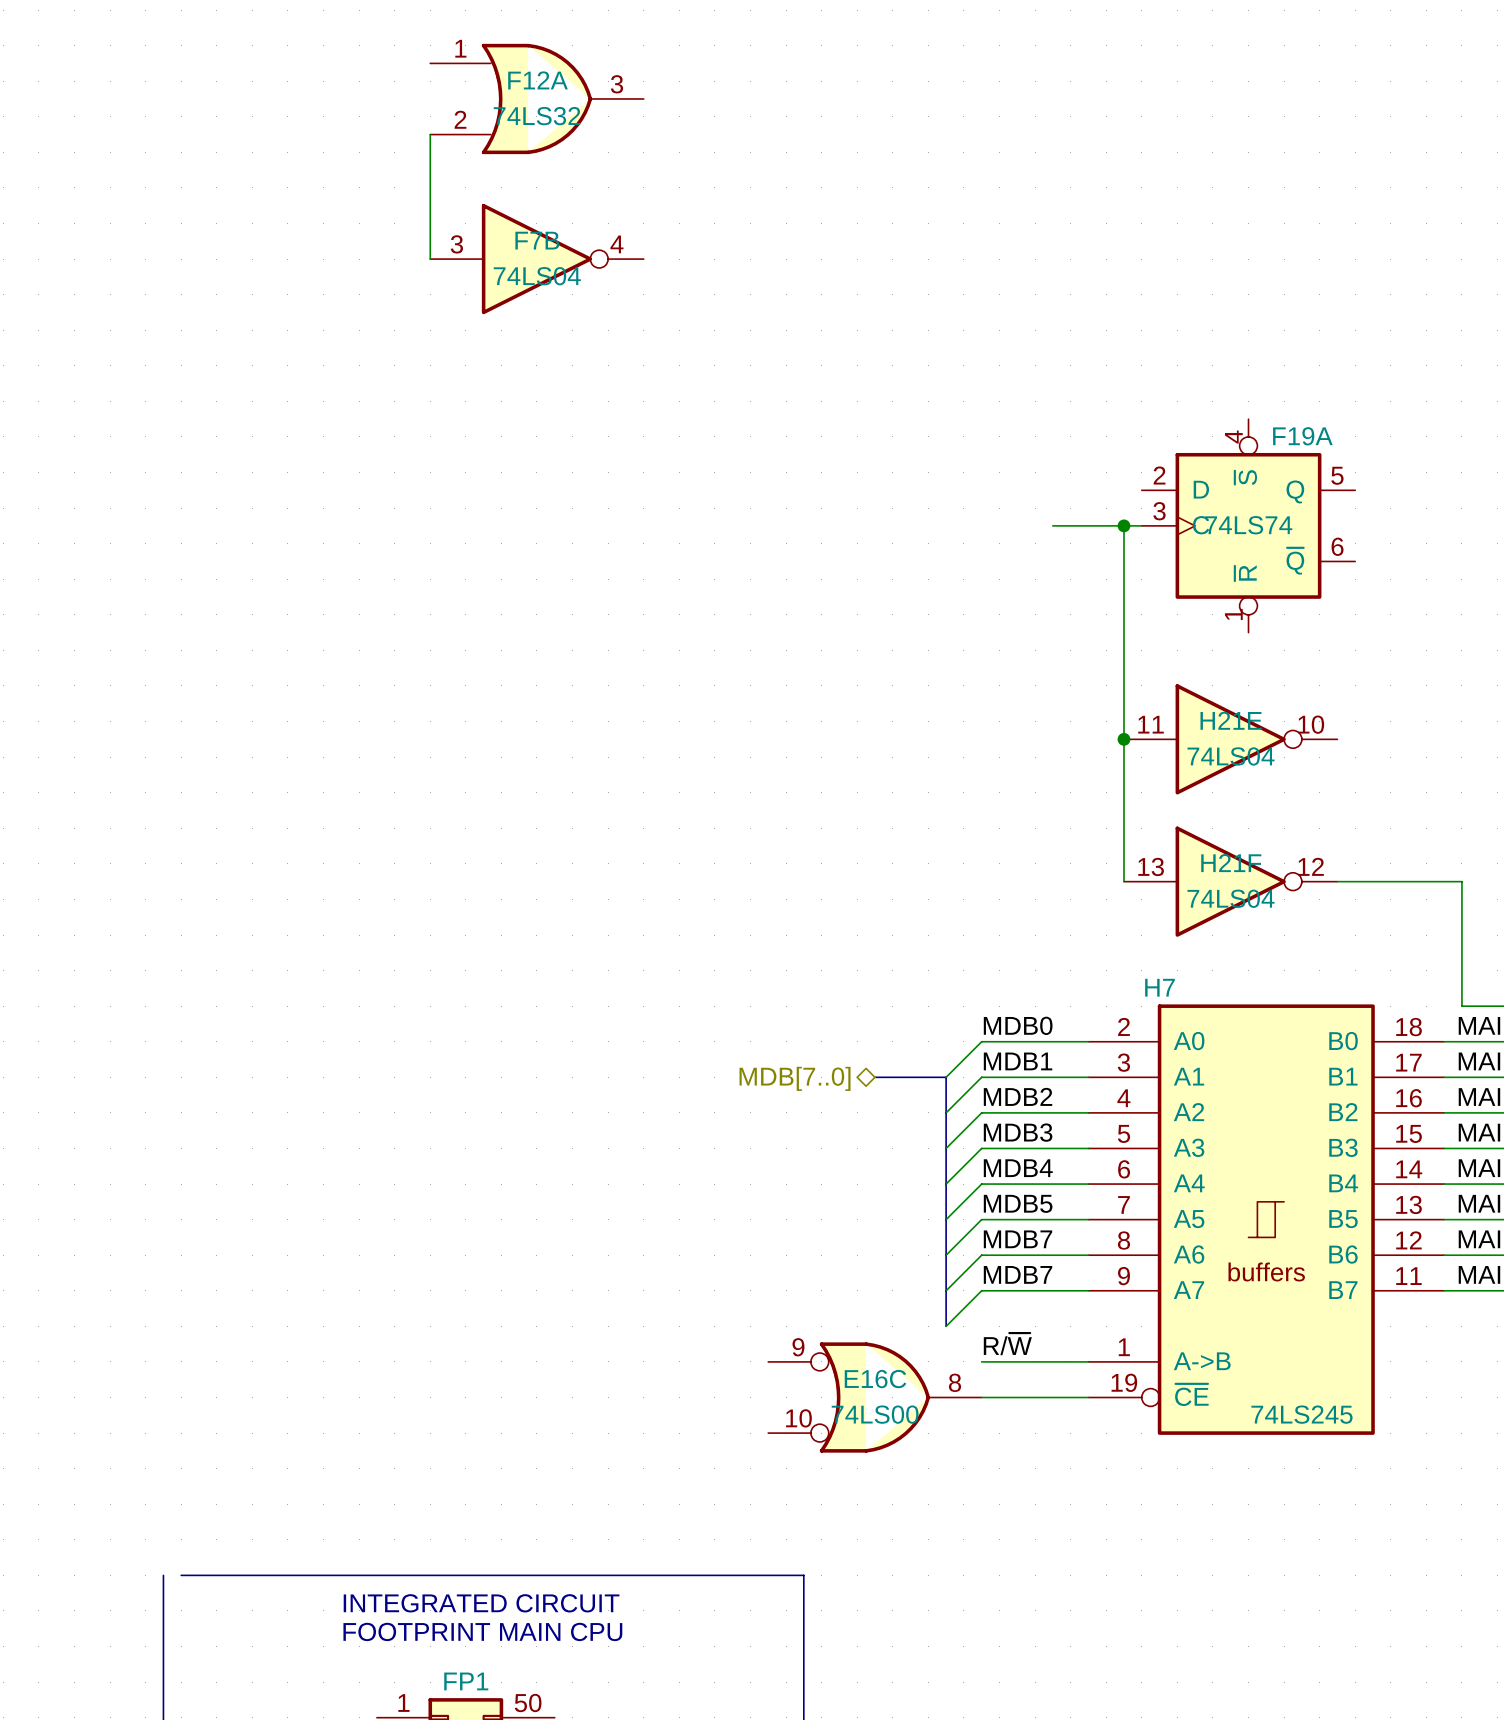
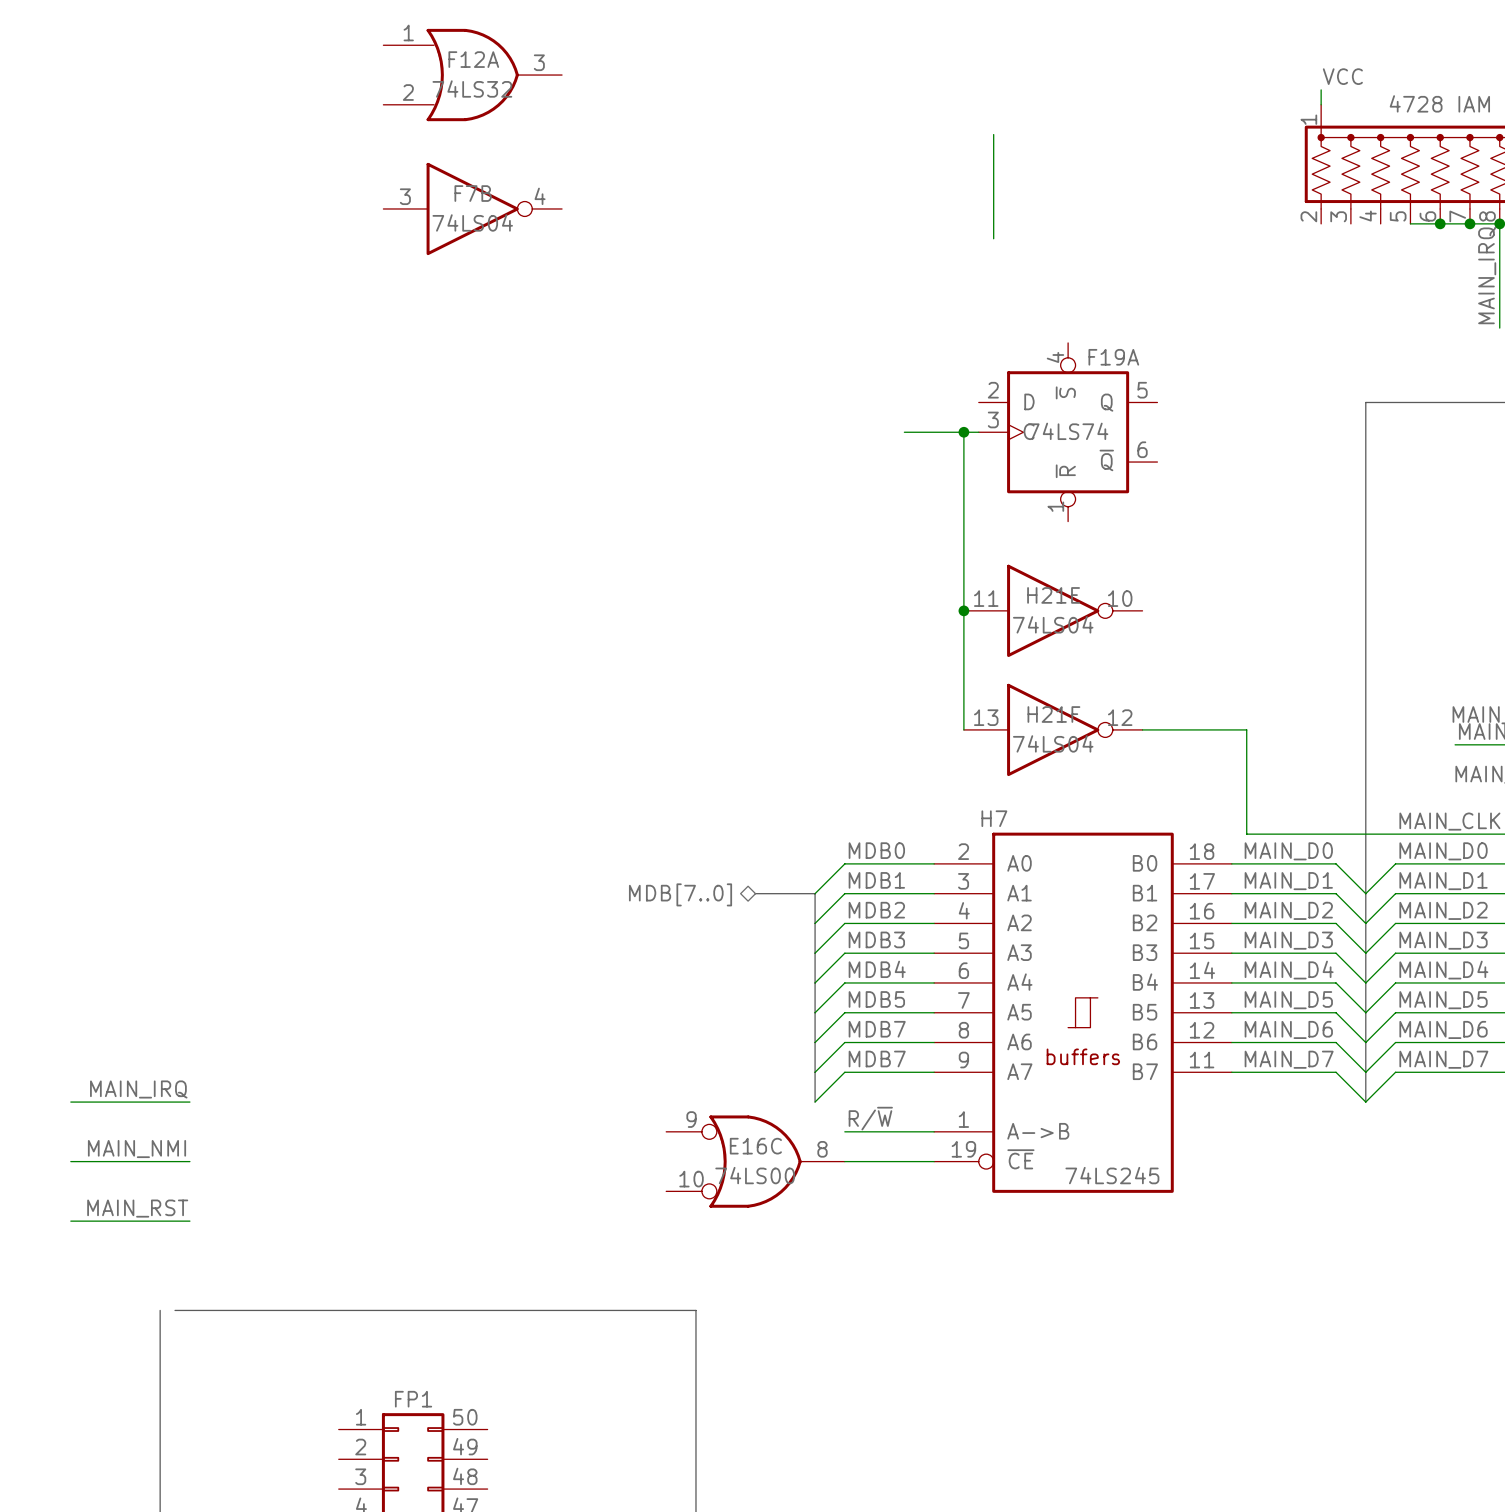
wire: (430, 134) (430, 259) -> none
wire: none -> (993, 134) (993, 238)
label: none -> MAIN_IRQ (138, 1089)
wire: none -> (70, 1102) (189, 1102)
label: none -> MAIN_NMI (136, 1149)
wire: none -> (70, 1161) (189, 1161)
label: none -> MAIN_RST (137, 1208)
wire: none -> (70, 1221) (189, 1221)
text: INTEGRATED CIRCUIT (481, 1603) -> none
text: FOOTPRINT MAIN CPU (482, 1631) -> none

